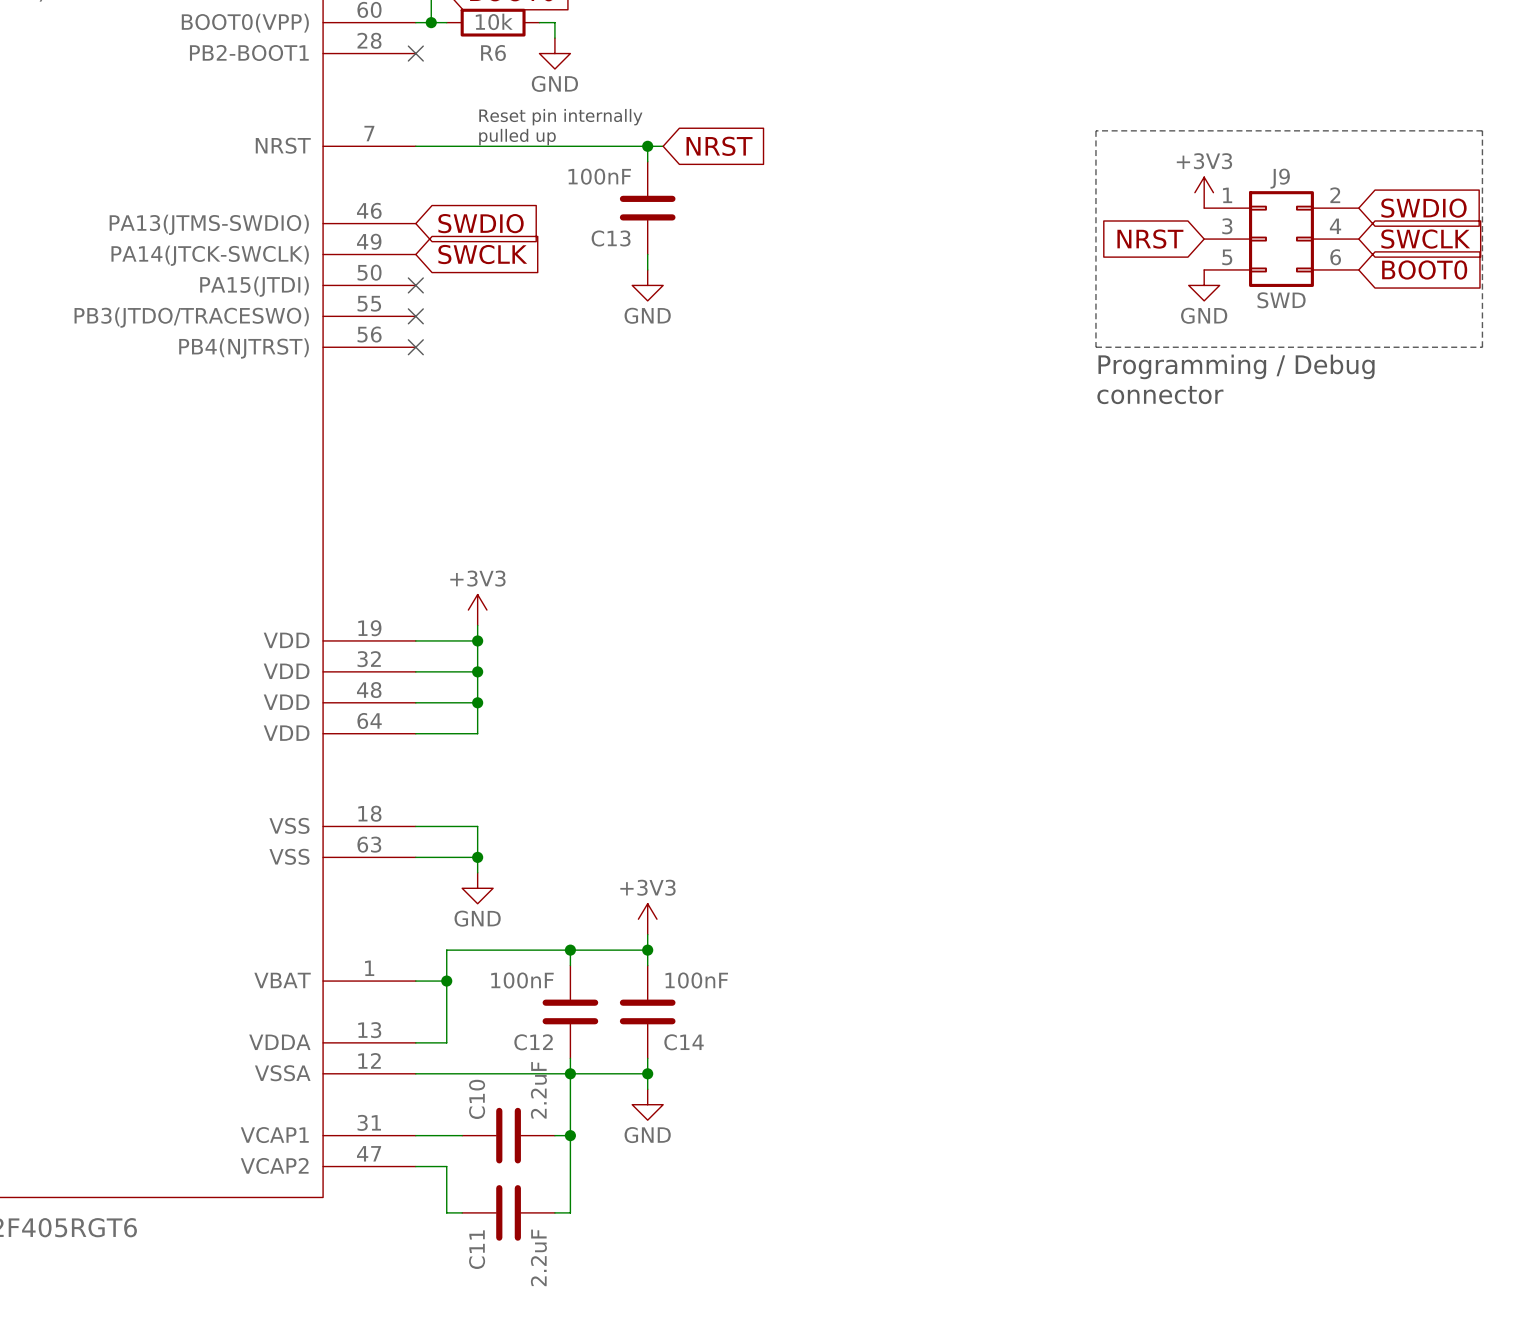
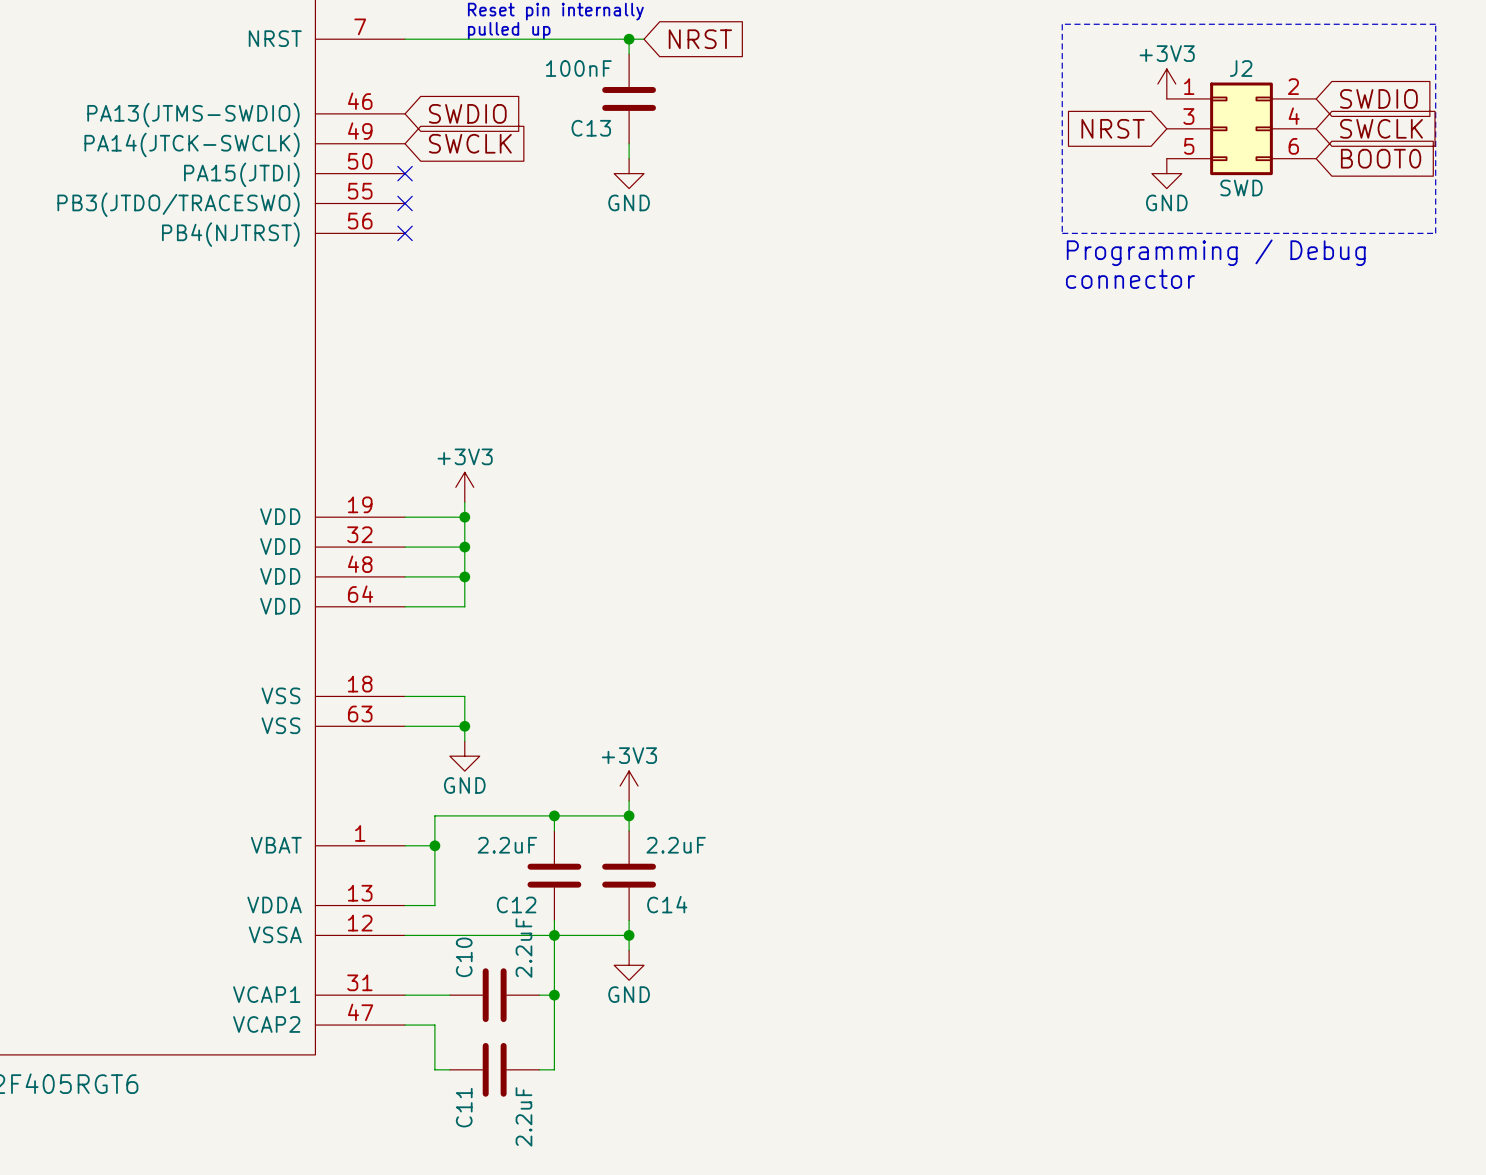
J9 name: J9 (1280, 178) -> J2 (1241, 68)
C12 value: 100nF (522, 980) -> 2.2uF (507, 845)
C14 value: 100nF (696, 980) -> 2.2uF (676, 845)

